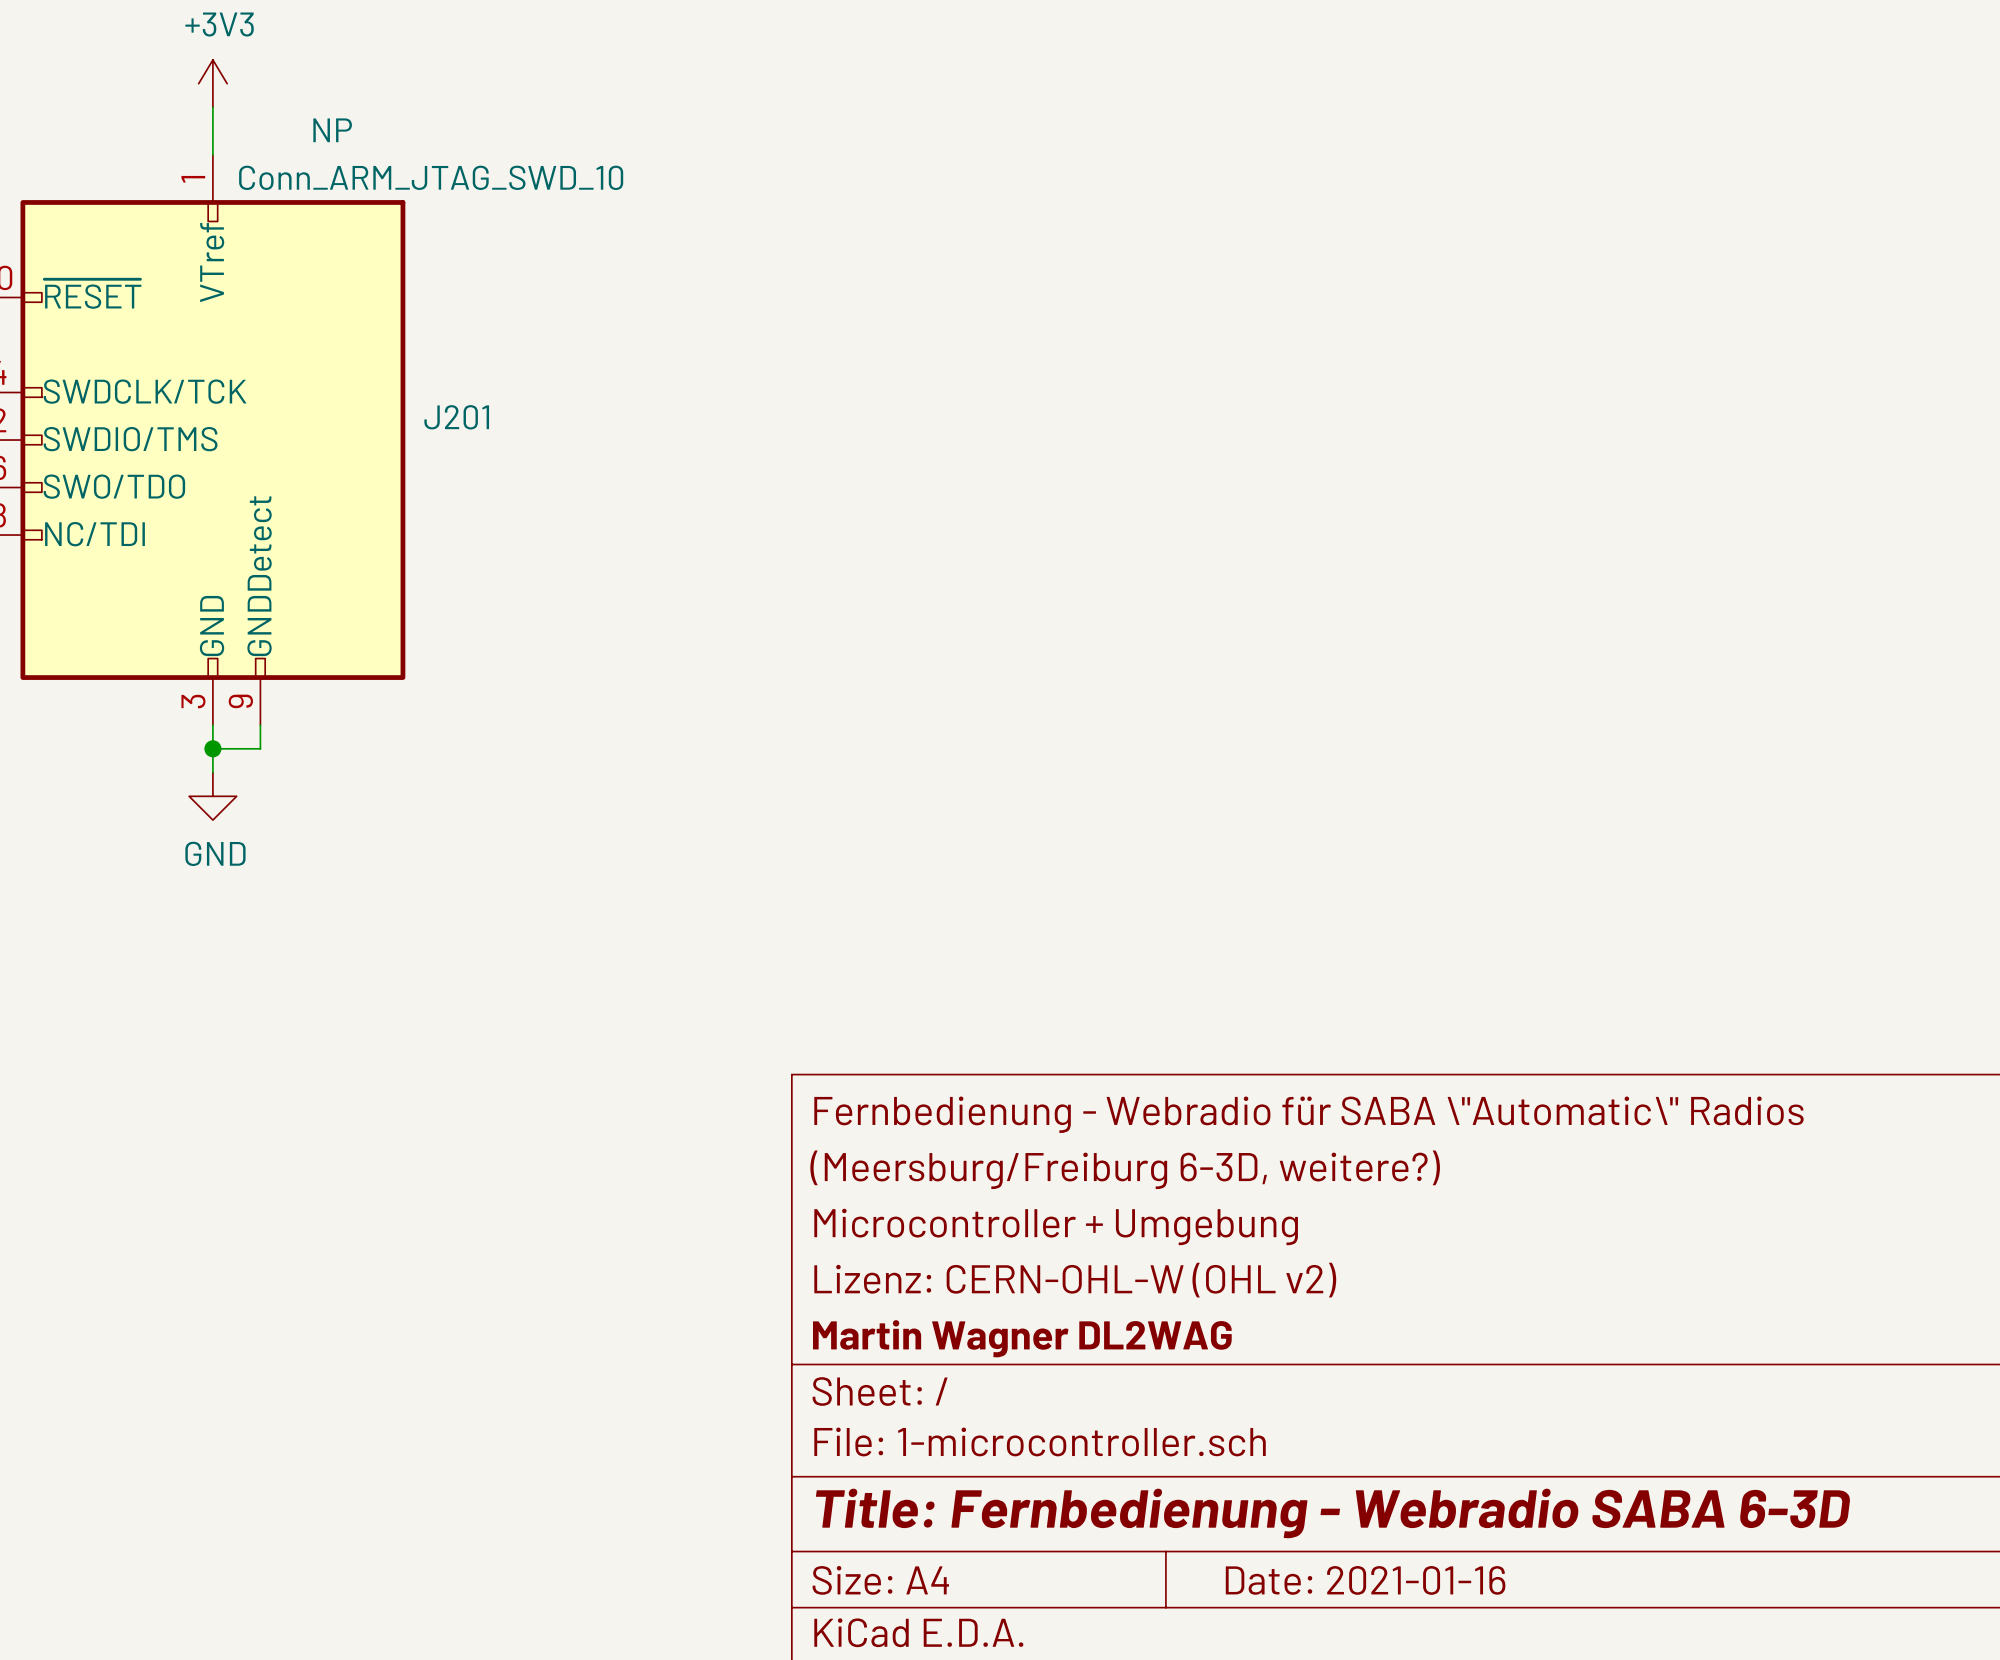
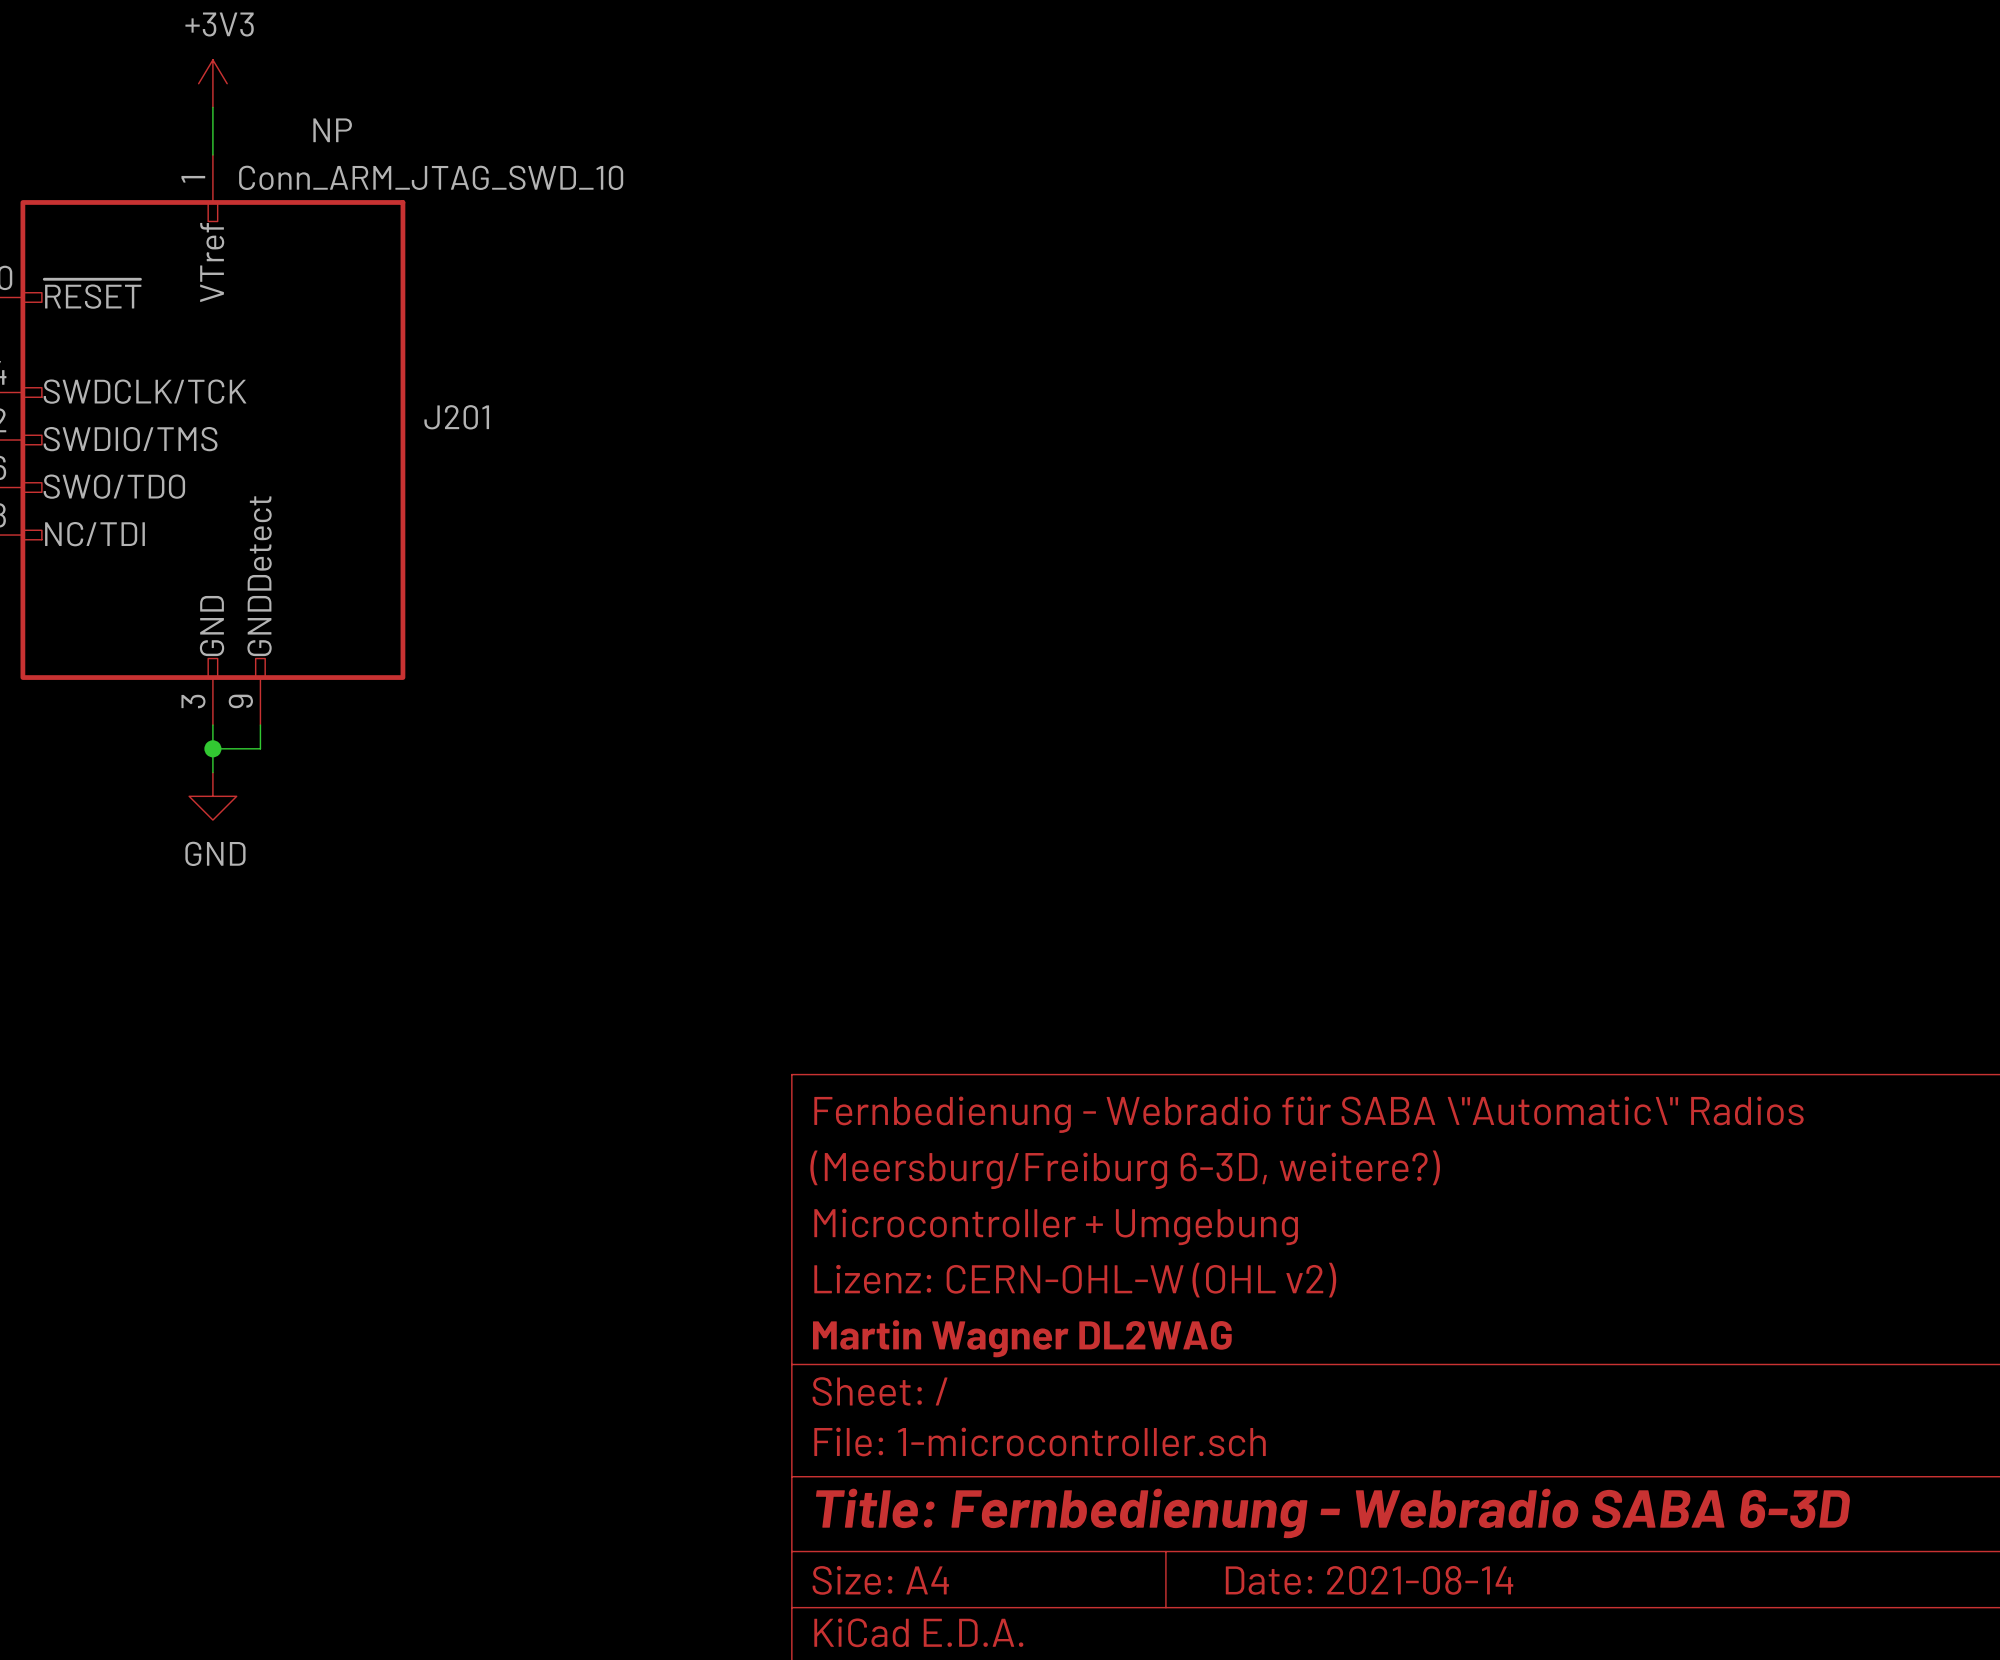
title block: Date: 2021-01-16 (1365, 1580) -> Date: 2021-08-14 (1369, 1580)

